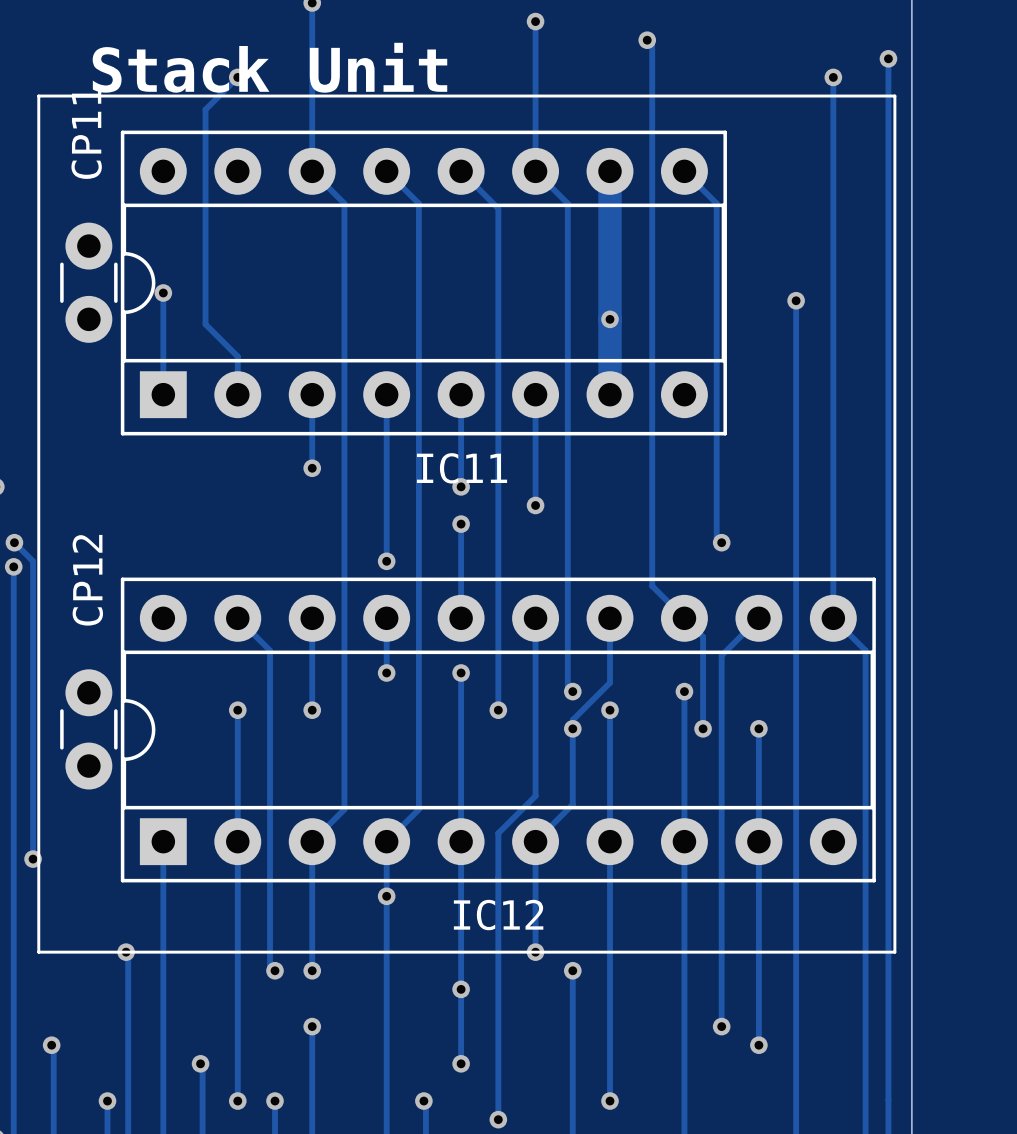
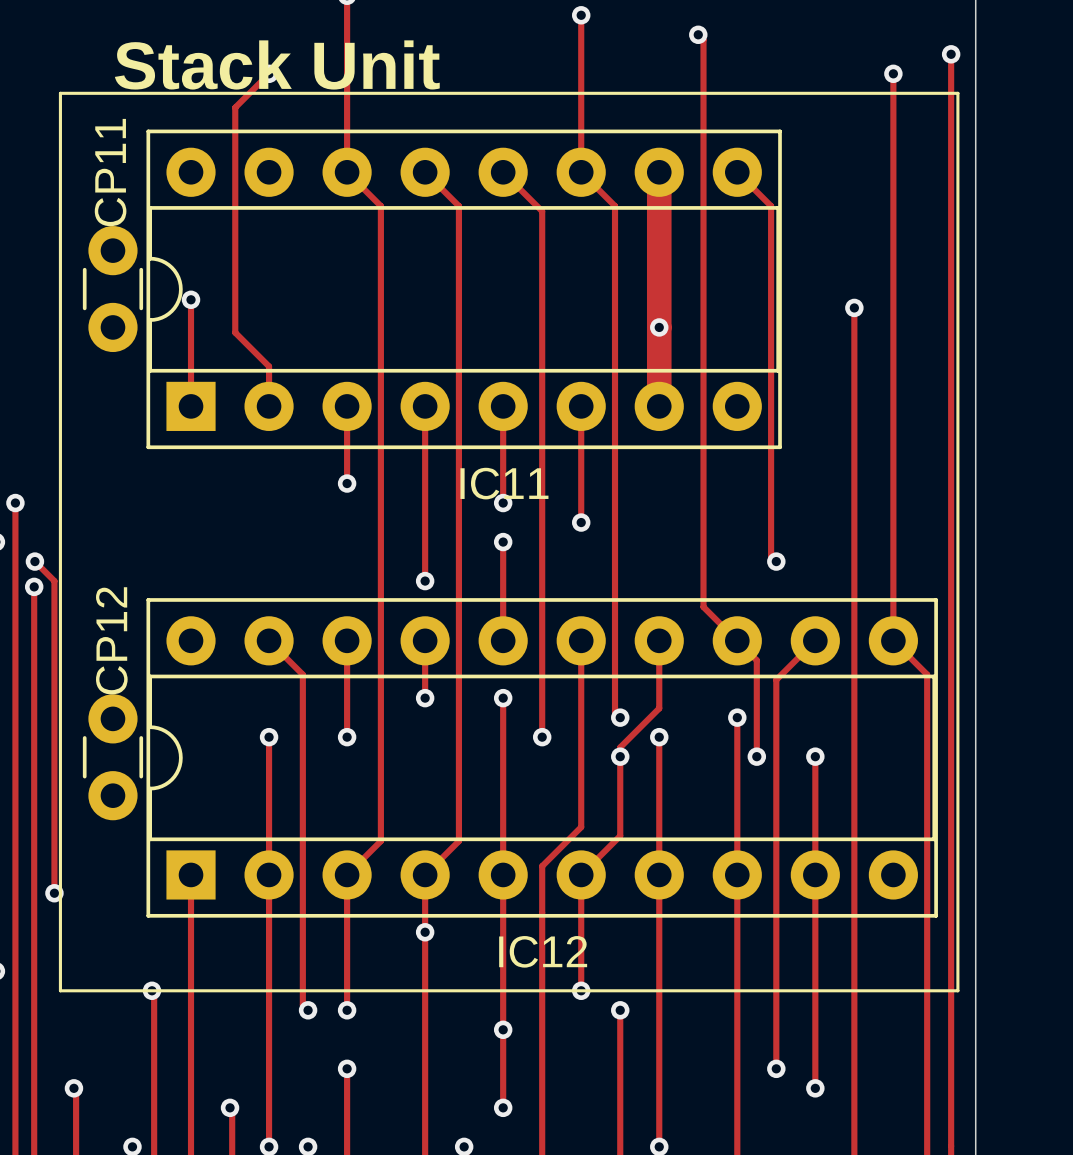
CP11 name position: CP11 (86, 133) -> CP11 (110, 172)
CP12 name position: CP12 (87, 580) -> CP12 (111, 640)

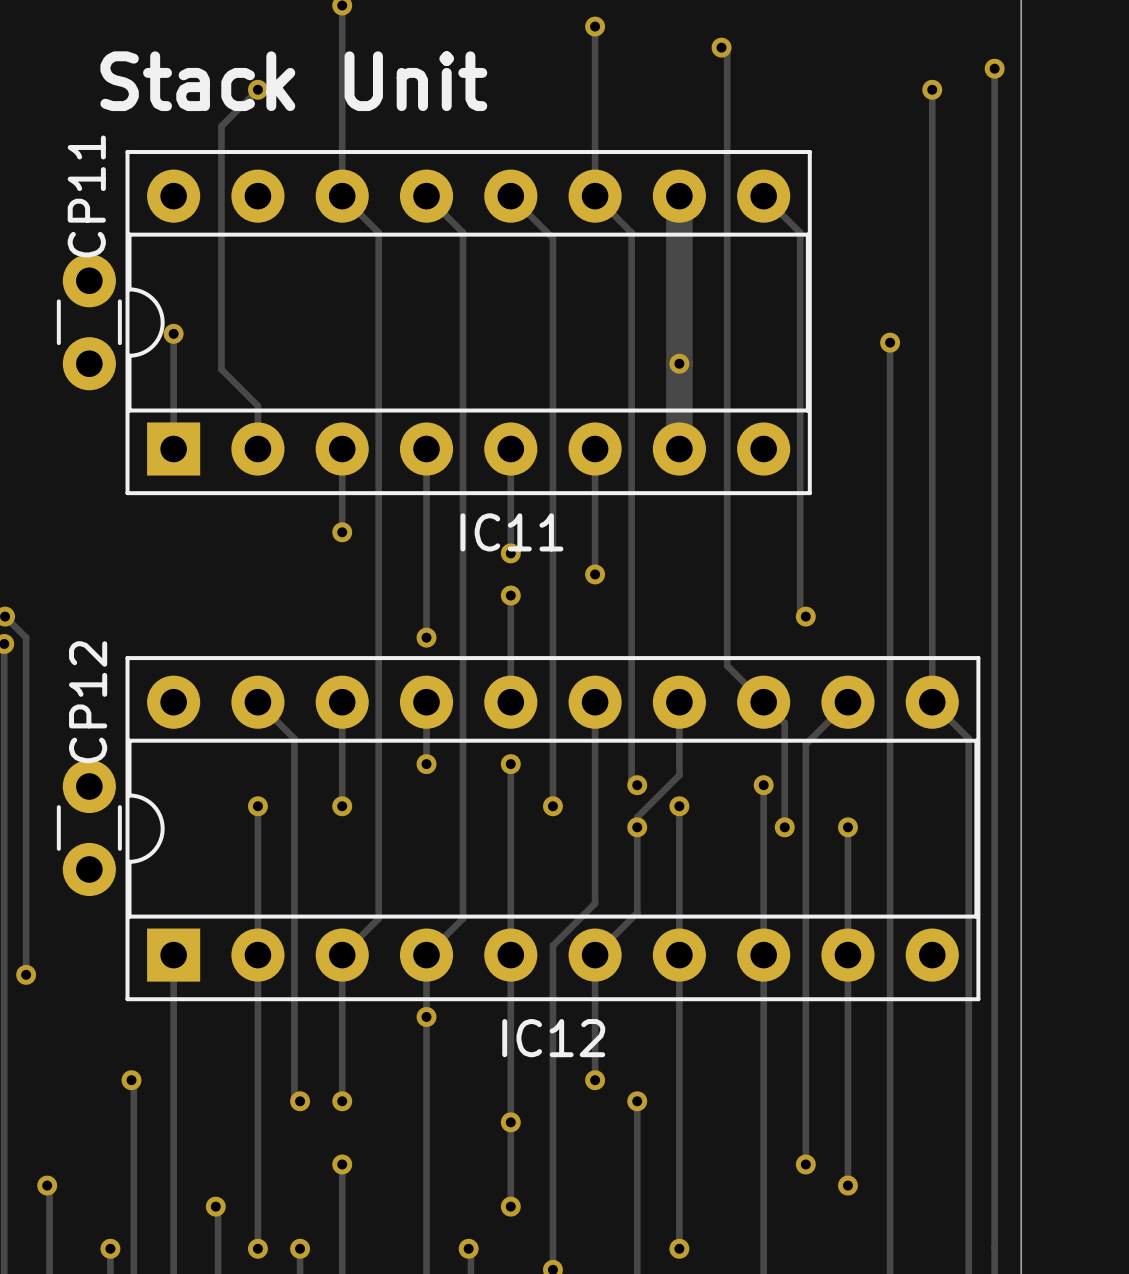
line: (60, 93) (957, 93) (957, 990) (60, 990) (60, 93) -> none

